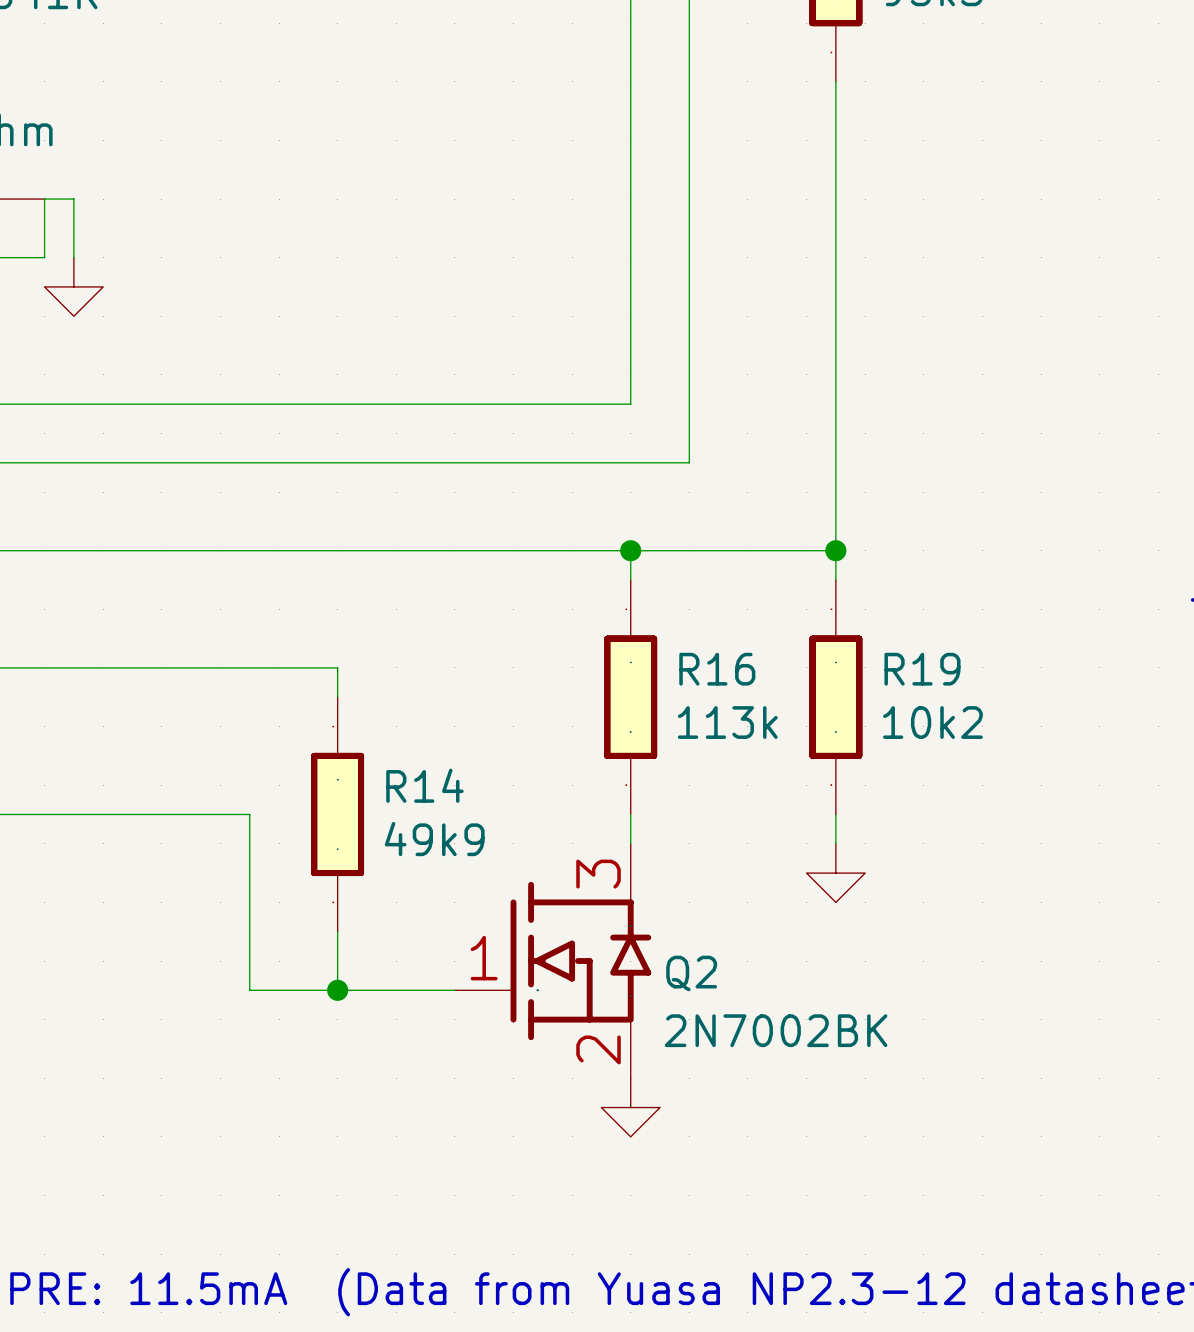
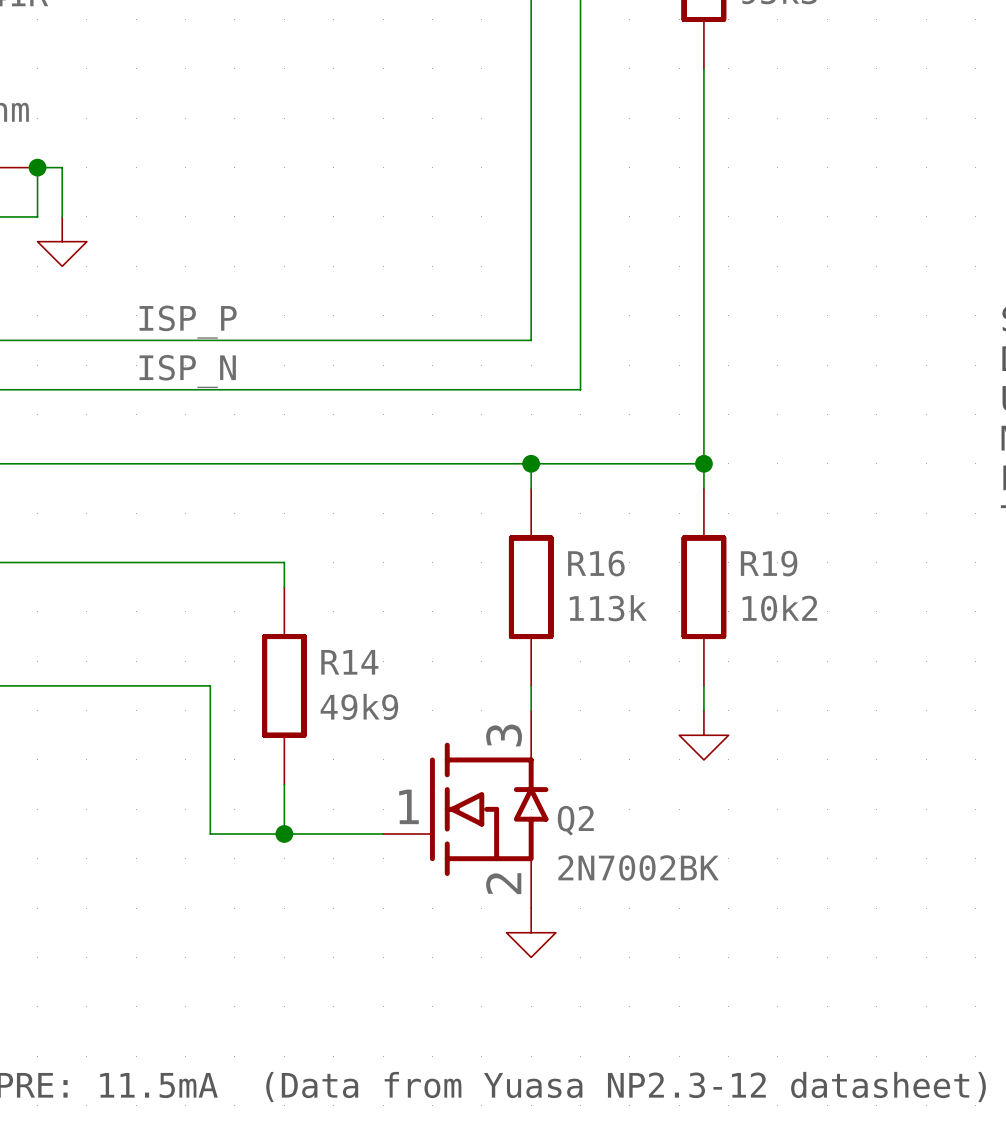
junction: none -> (37, 167)
label: none -> ISP_P (188, 322)
label: none -> ISP_N (187, 371)

